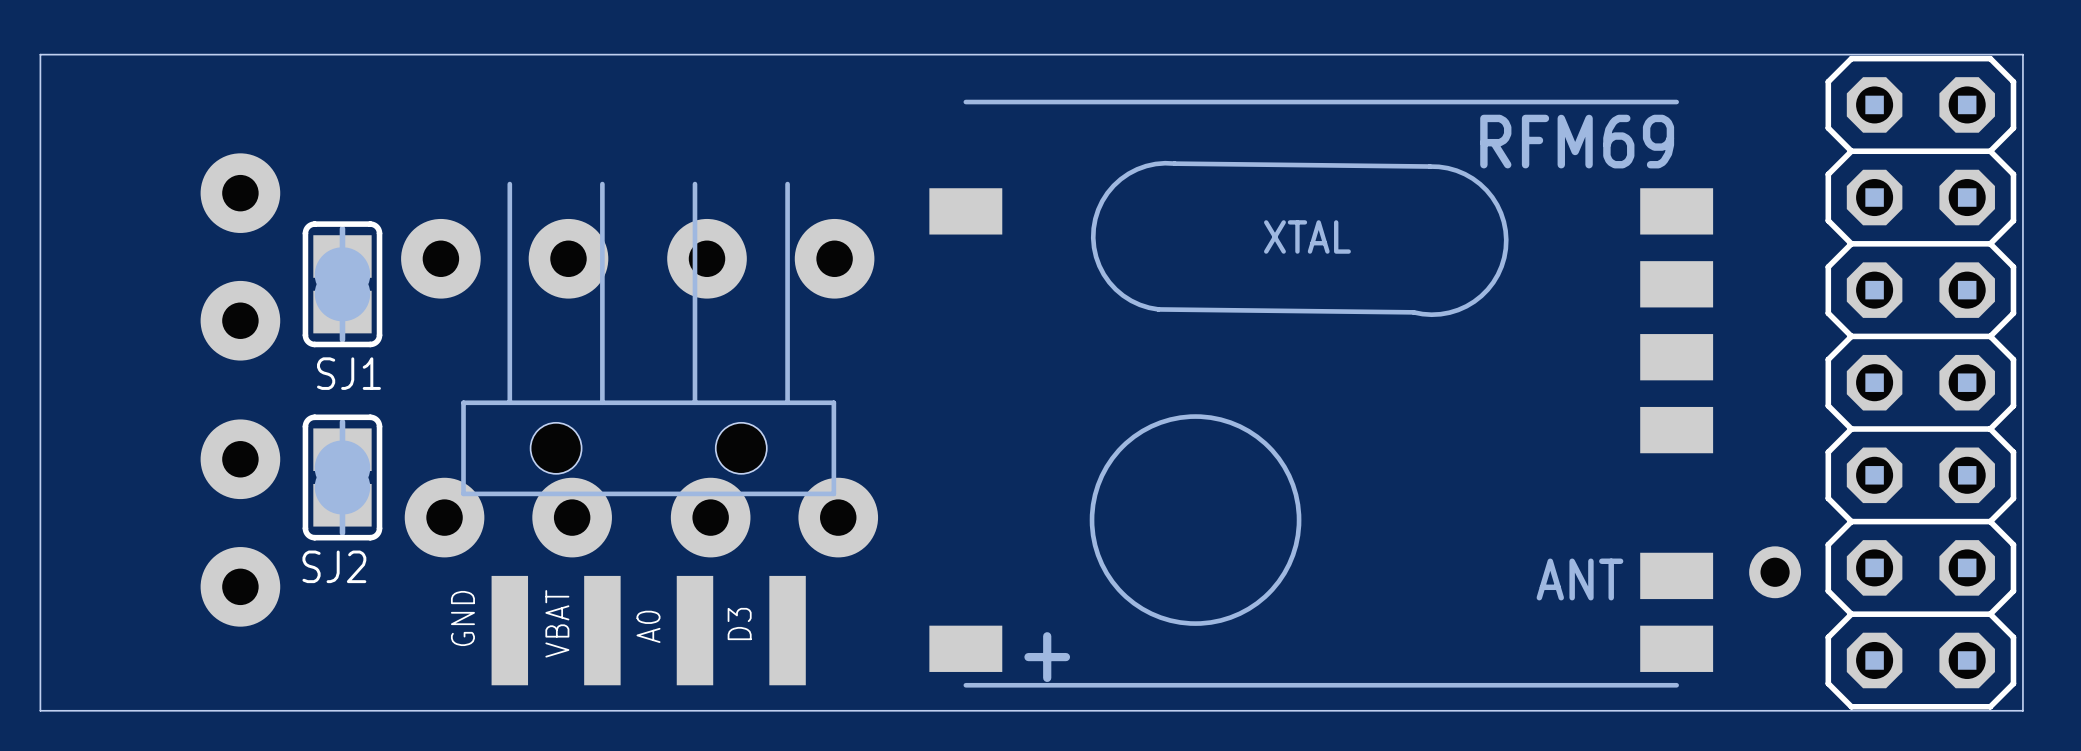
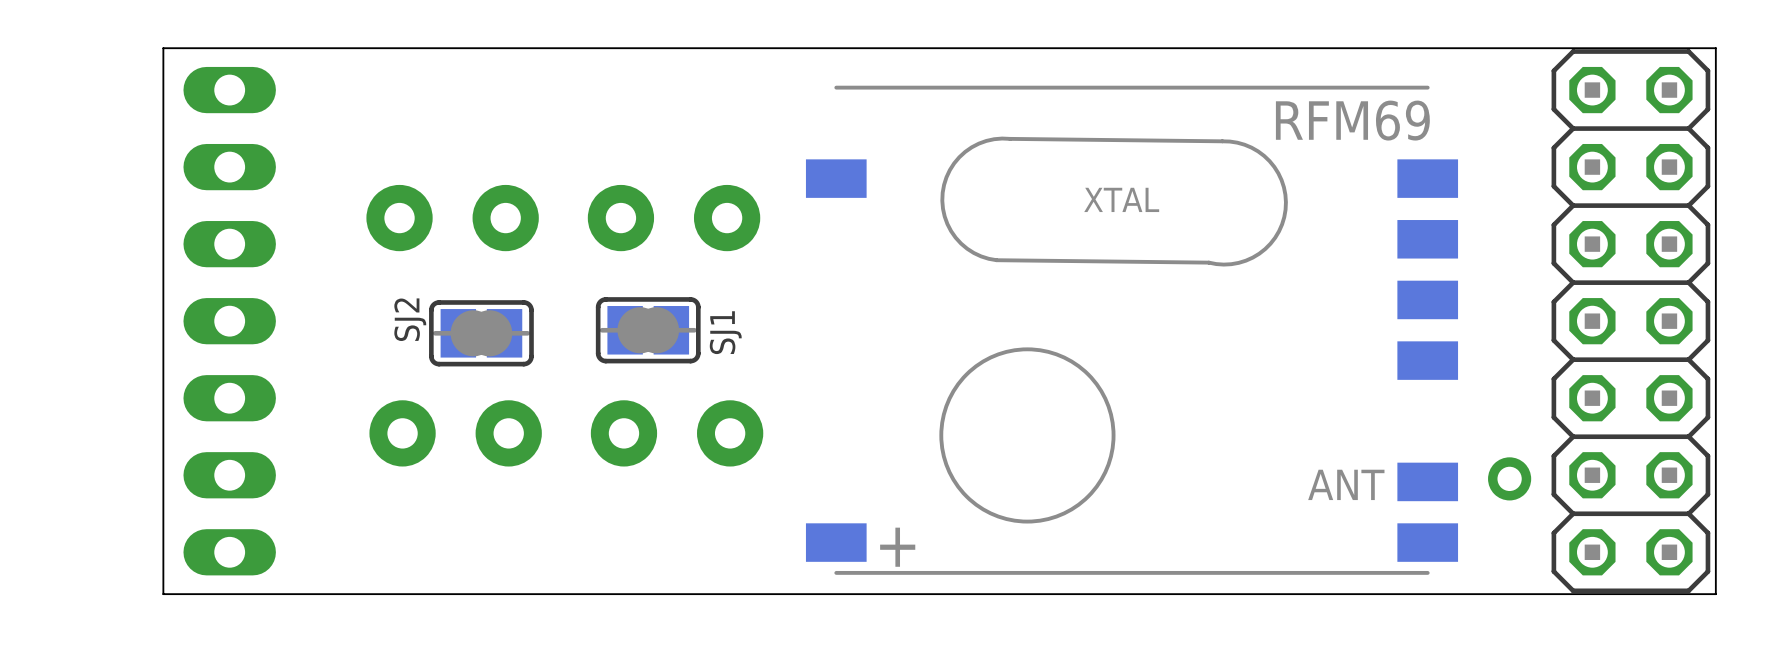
board edge: (157, 54) (40, 54) (40, 710) (157, 710) -> (163, 48) (163, 594)
part: (240, 256) -> none
SJ1 rotation: 0° (342, 284) -> 90° clockwise (648, 330)
SJ1 position: (342, 284) -> (648, 330)
SJ1 name position: SJ1 (348, 373) -> SJ1 (725, 332)
part: none -> (229, 321)
part: (648, 433) -> none
SJ2 rotation: 0° (342, 477) -> 90° clockwise (481, 333)
SJ2 position: (342, 477) -> (481, 333)
part: (240, 523) -> none
text: GND (462, 618) -> none
text: VBAT (557, 623) -> none
text: D3 (739, 624) -> none
text: A0 (648, 626) -> none

